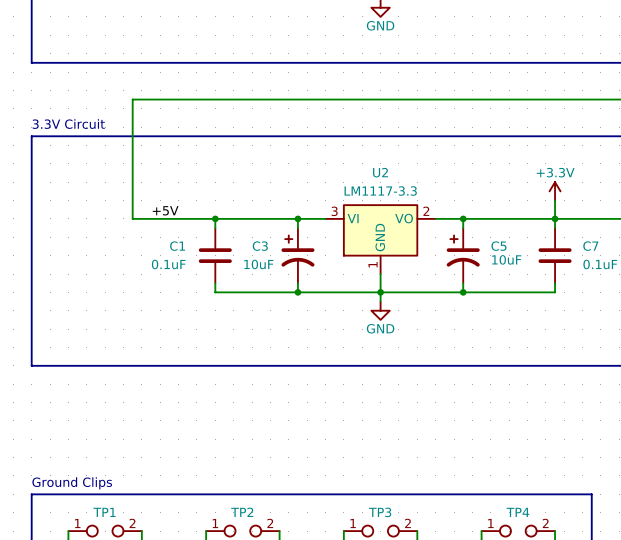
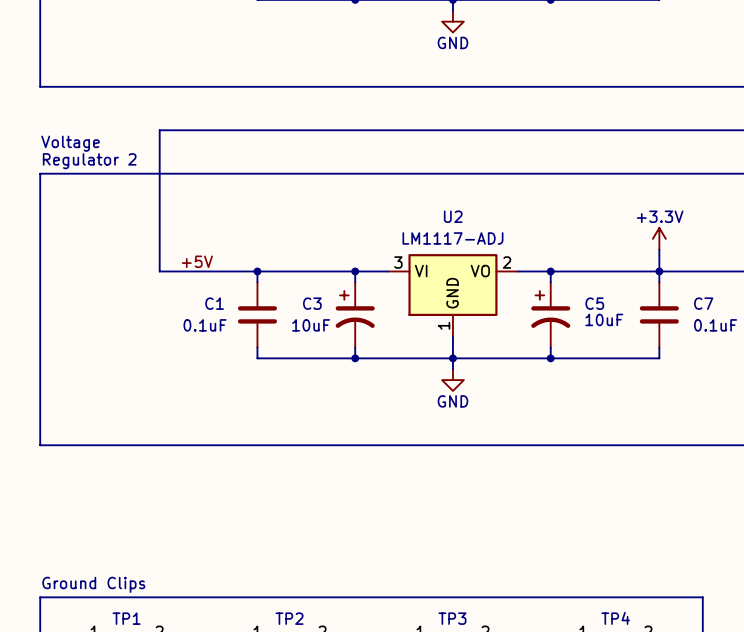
text: none -> Voltage (70, 143)
text: 3.3V Circuit (68, 124) -> Regulator 2 (89, 161)
U2 value: LM1117-3.3 (380, 191) -> LM1117-ADJ (452, 238)

